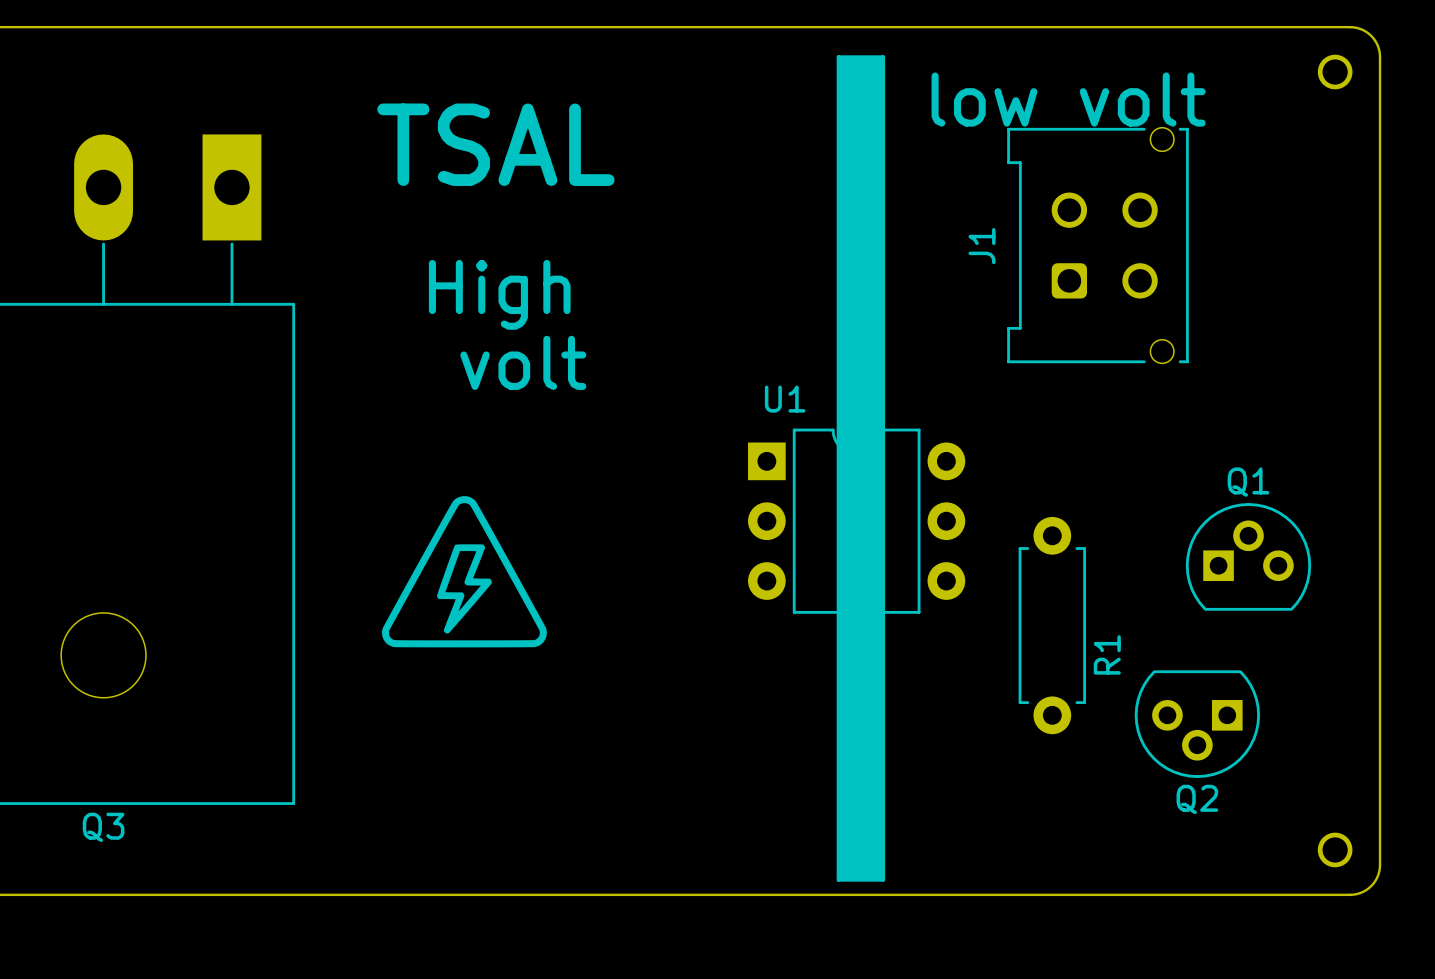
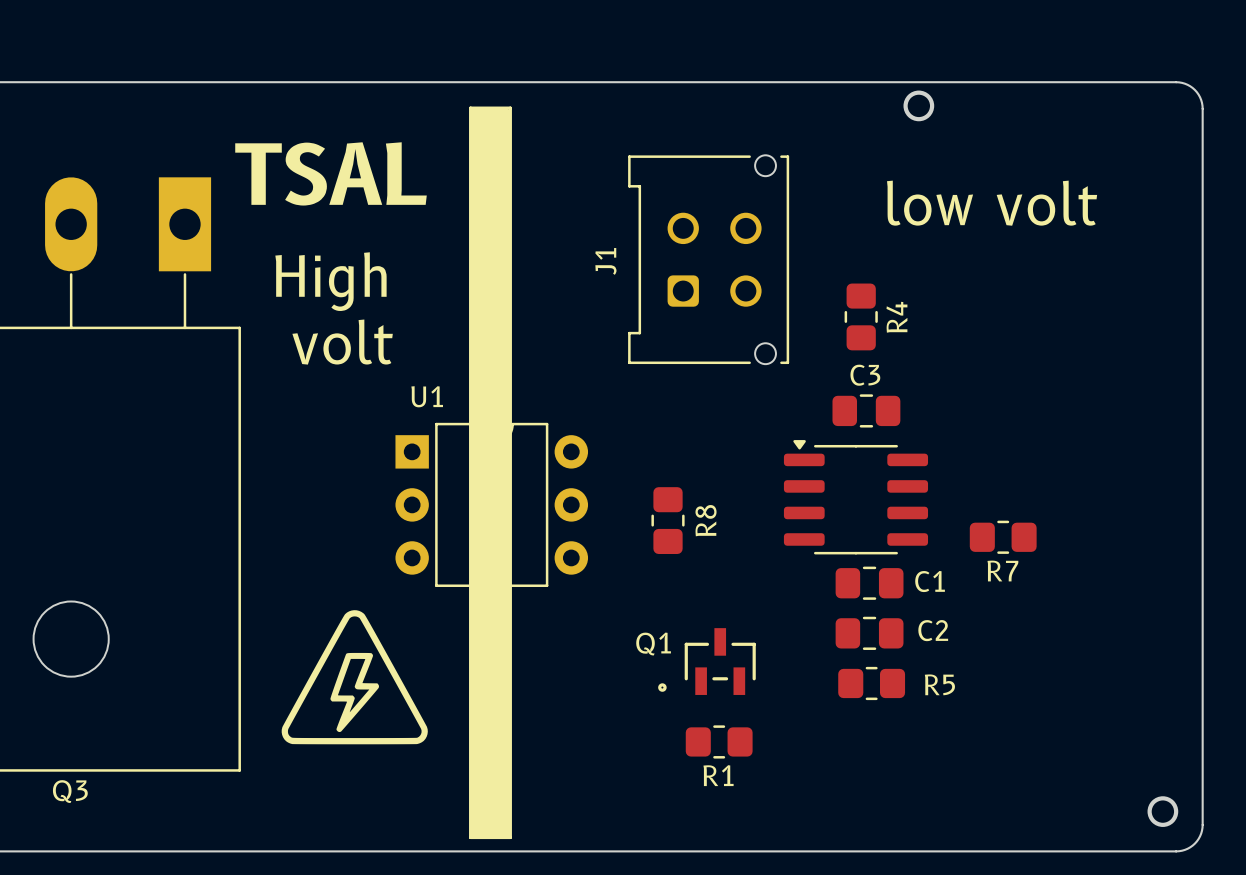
line: (838, 57) (883, 57) (883, 879) (838, 879) (838, 57) -> (470, 108) (510, 108) (510, 837) (470, 837) (470, 108)
round board edge position: (1335, 72) -> (918, 105)
text position: low volt (1068, 99) -> low volt (992, 203)
text position: TSAL (495, 144) -> TSAL (331, 173)
J1 position: (1097, 245) -> (708, 259)
R4: none -> (861, 316)
text position: High (499, 294) -> High (330, 281)
text position: volt (523, 362) -> volt (342, 342)
C3: none -> (866, 410)
drawing position: (860, 468) -> (489, 473)
Q1 name position: Q1 (1248, 482) -> Q1 (653, 644)
part: none -> (855, 497)
Q1 footprint: [1185, 503, 1312, 611] -> [658, 628, 756, 695]
R1 footprint: [1018, 516, 1087, 735] -> [685, 725, 753, 759]
R8: none -> (668, 520)
U1 position: (856, 521) -> (491, 504)
R7: none -> (1003, 537)
drawing position: (464, 571) -> (354, 677)
C1: none -> (869, 583)
C2: none -> (869, 633)
R1 name position: R1 (1107, 654) -> R1 (718, 775)
R5: none -> (871, 683)
Q2: (1197, 724) -> none

